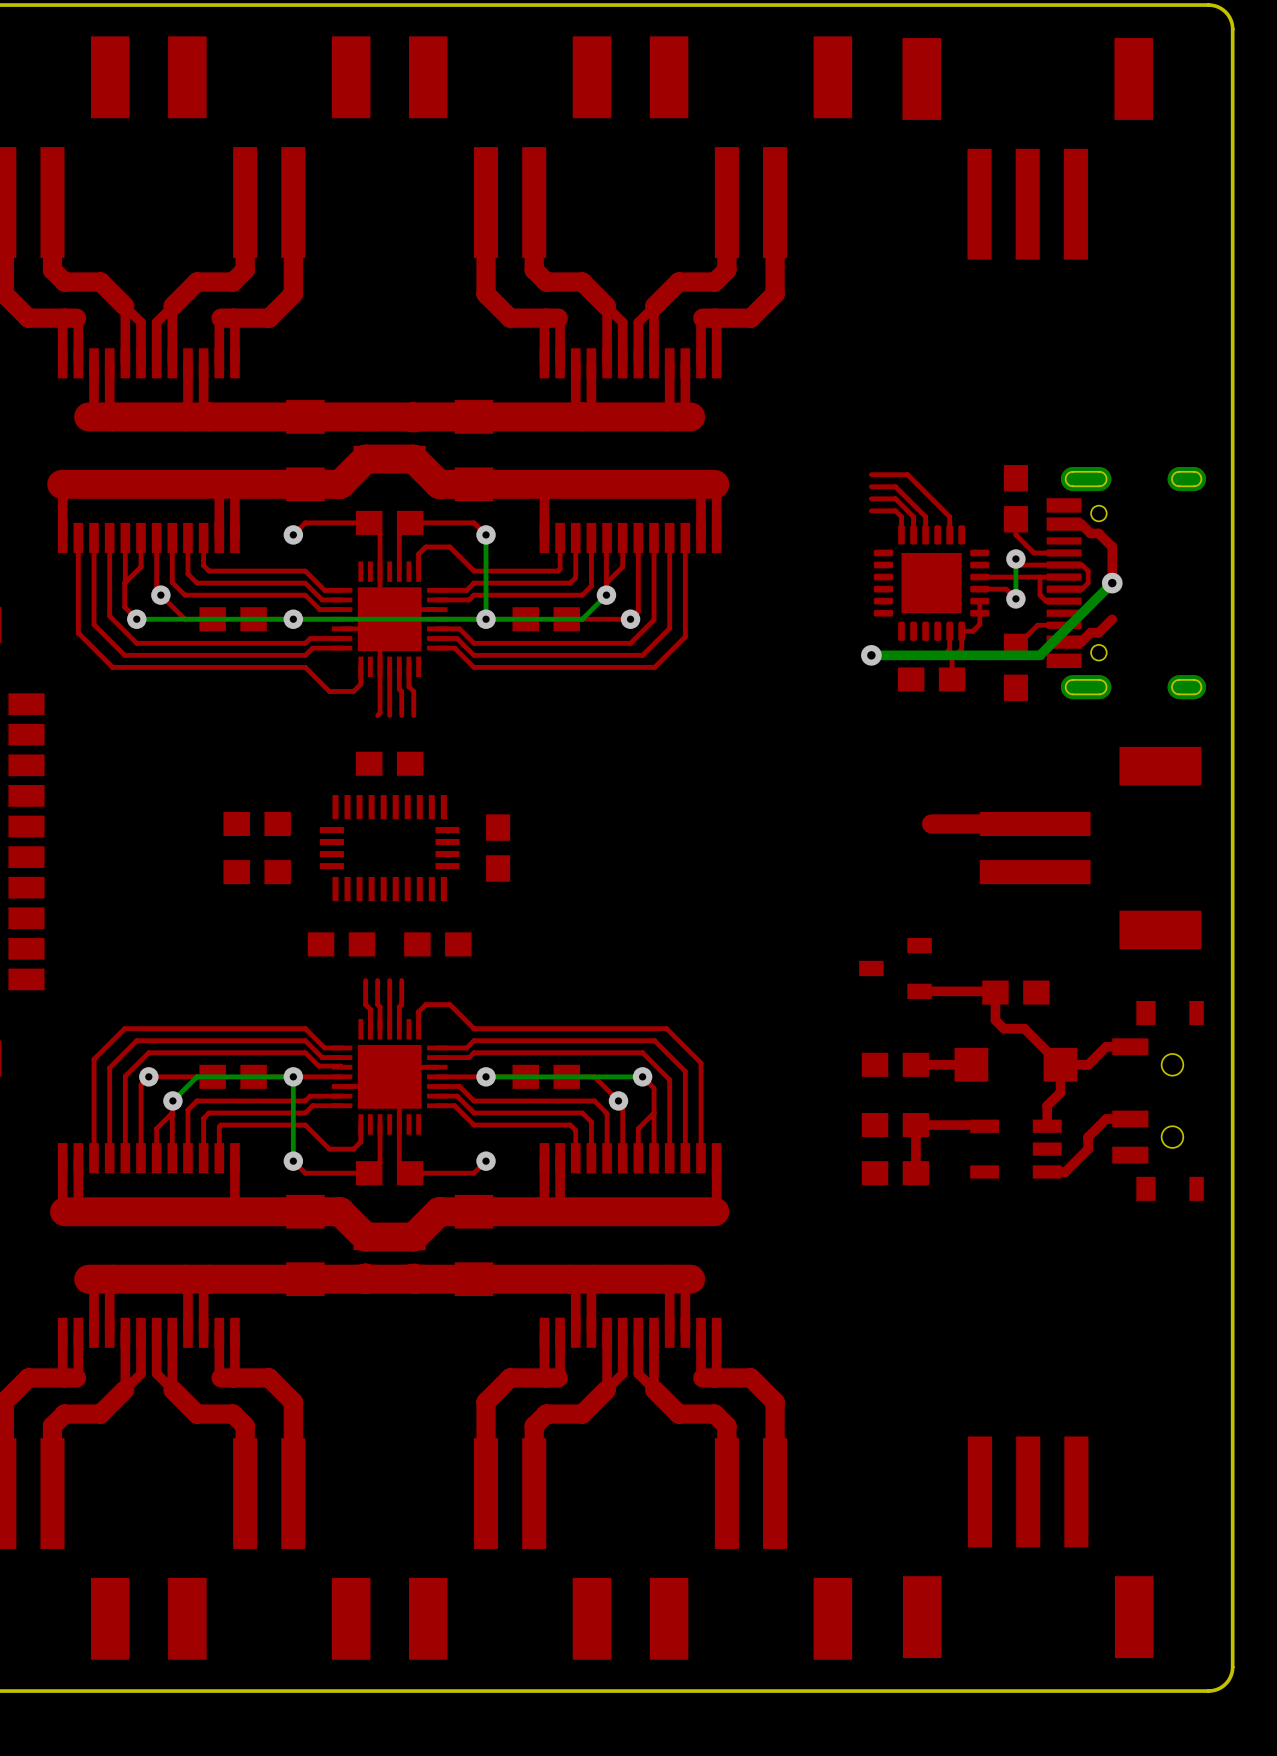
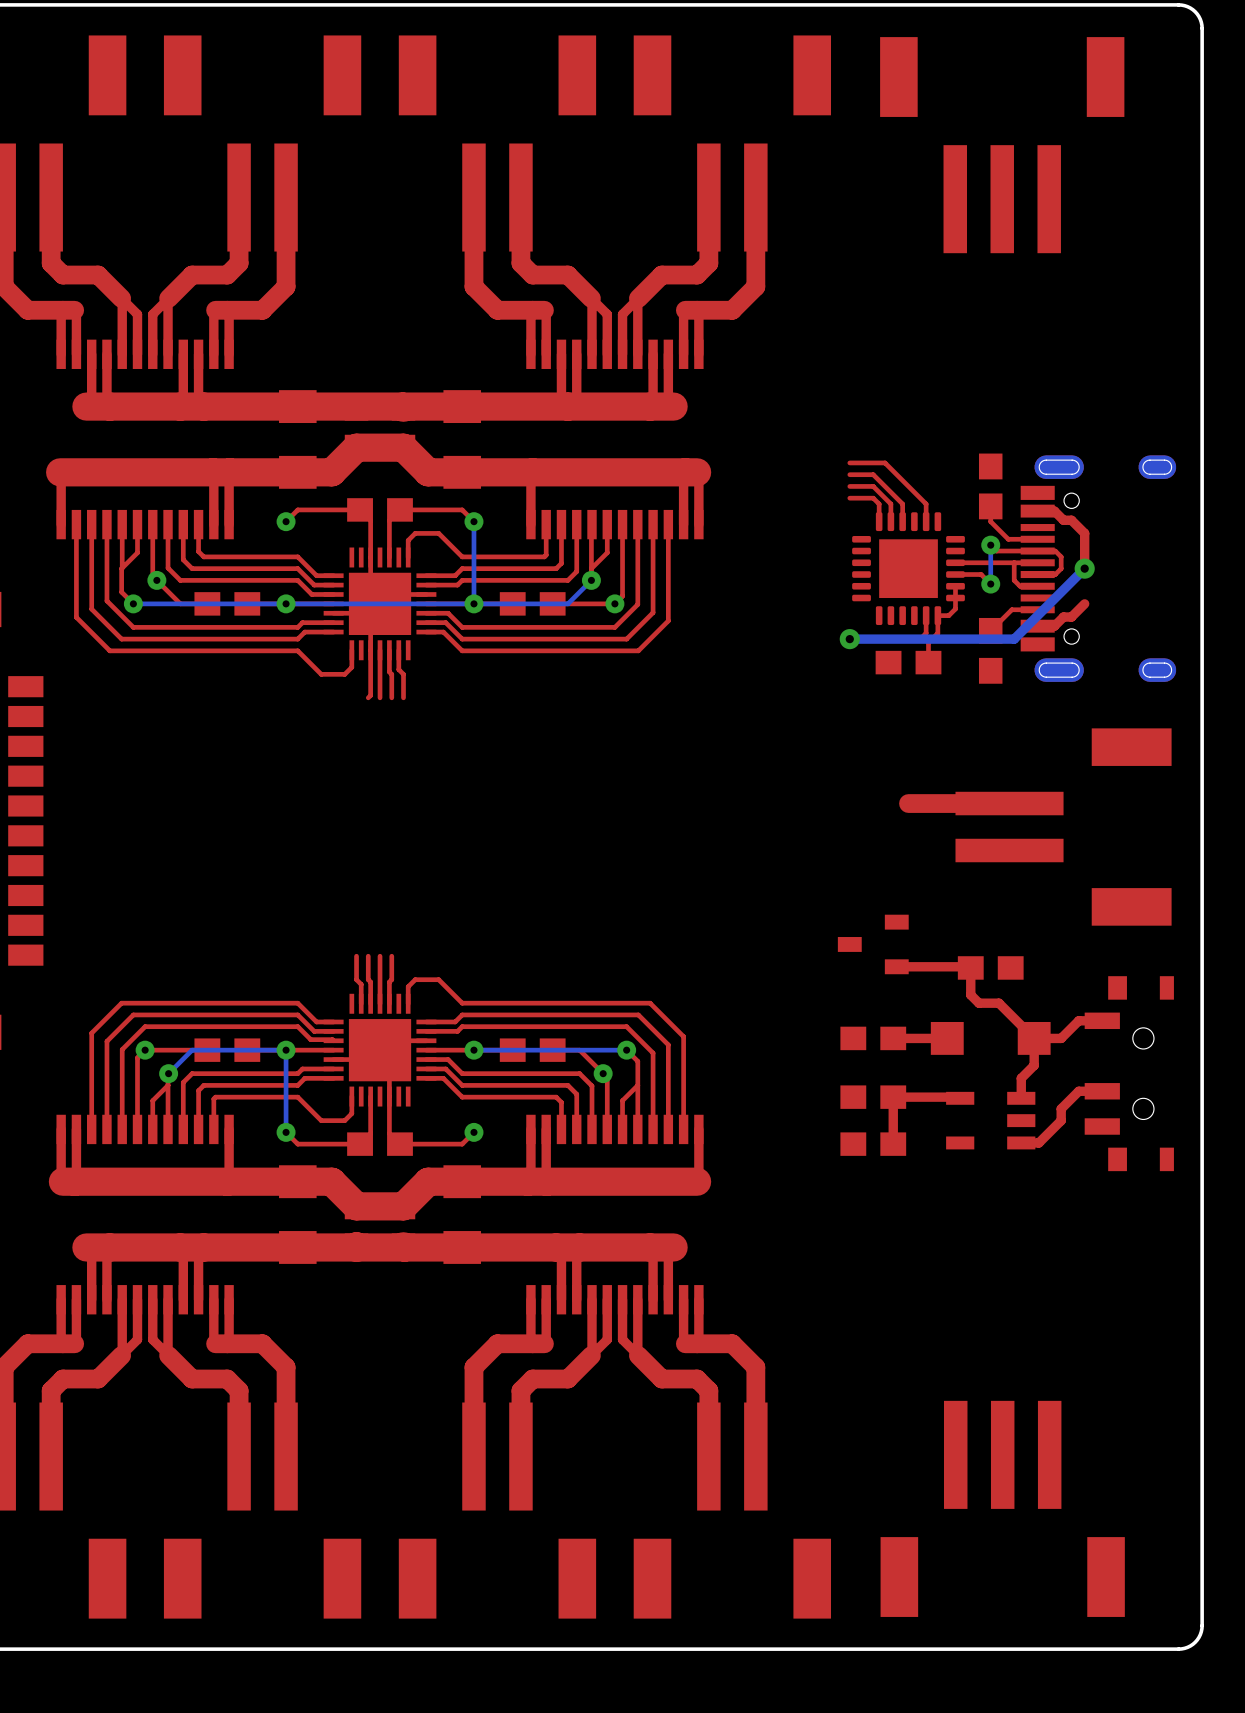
part: (389, 763) -> none
part: (257, 823) -> none
part: (389, 848) -> none
part: (498, 848) -> none
part: (257, 872) -> none
part: (341, 944) -> none
part: (437, 944) -> none

